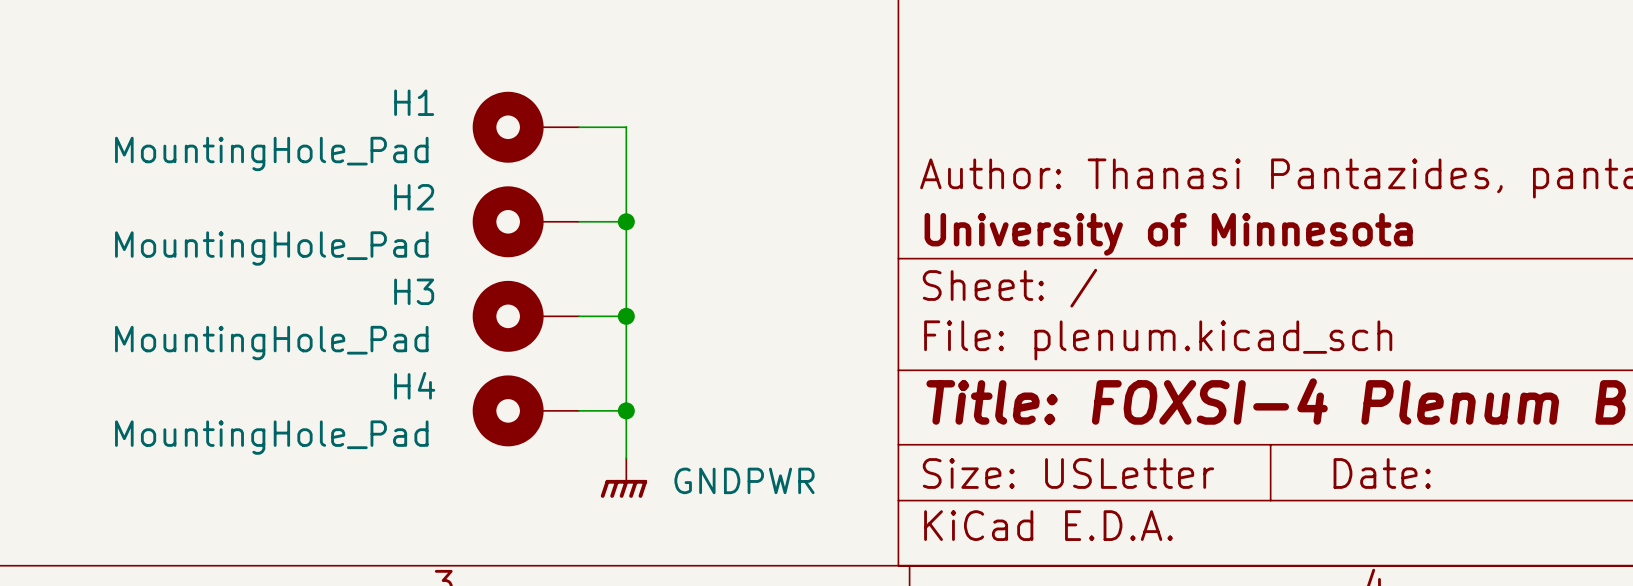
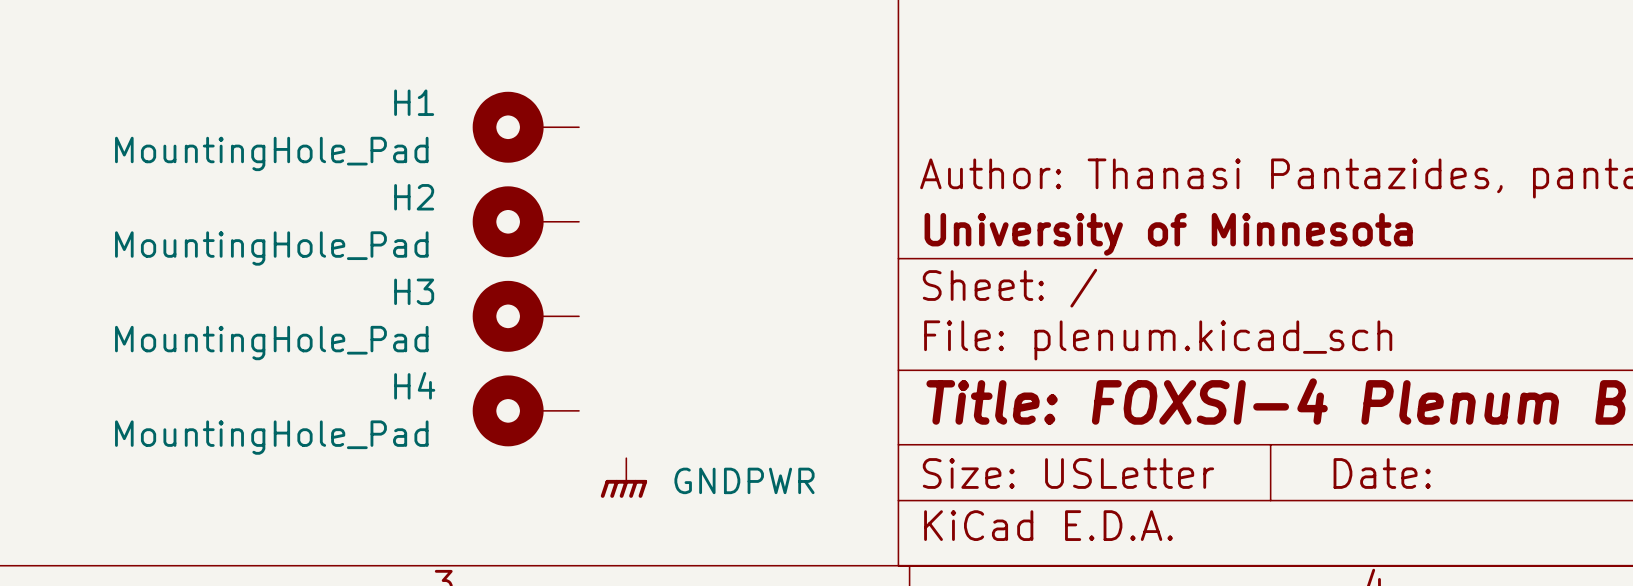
wire: (579, 127) (626, 127) (626, 458) -> none
wire: (579, 221) (626, 221) -> none
junction: (626, 221) -> none
wire: (579, 316) (626, 316) -> none
junction: (626, 316) -> none
wire: (579, 410) (626, 410) -> none
junction: (626, 410) -> none

